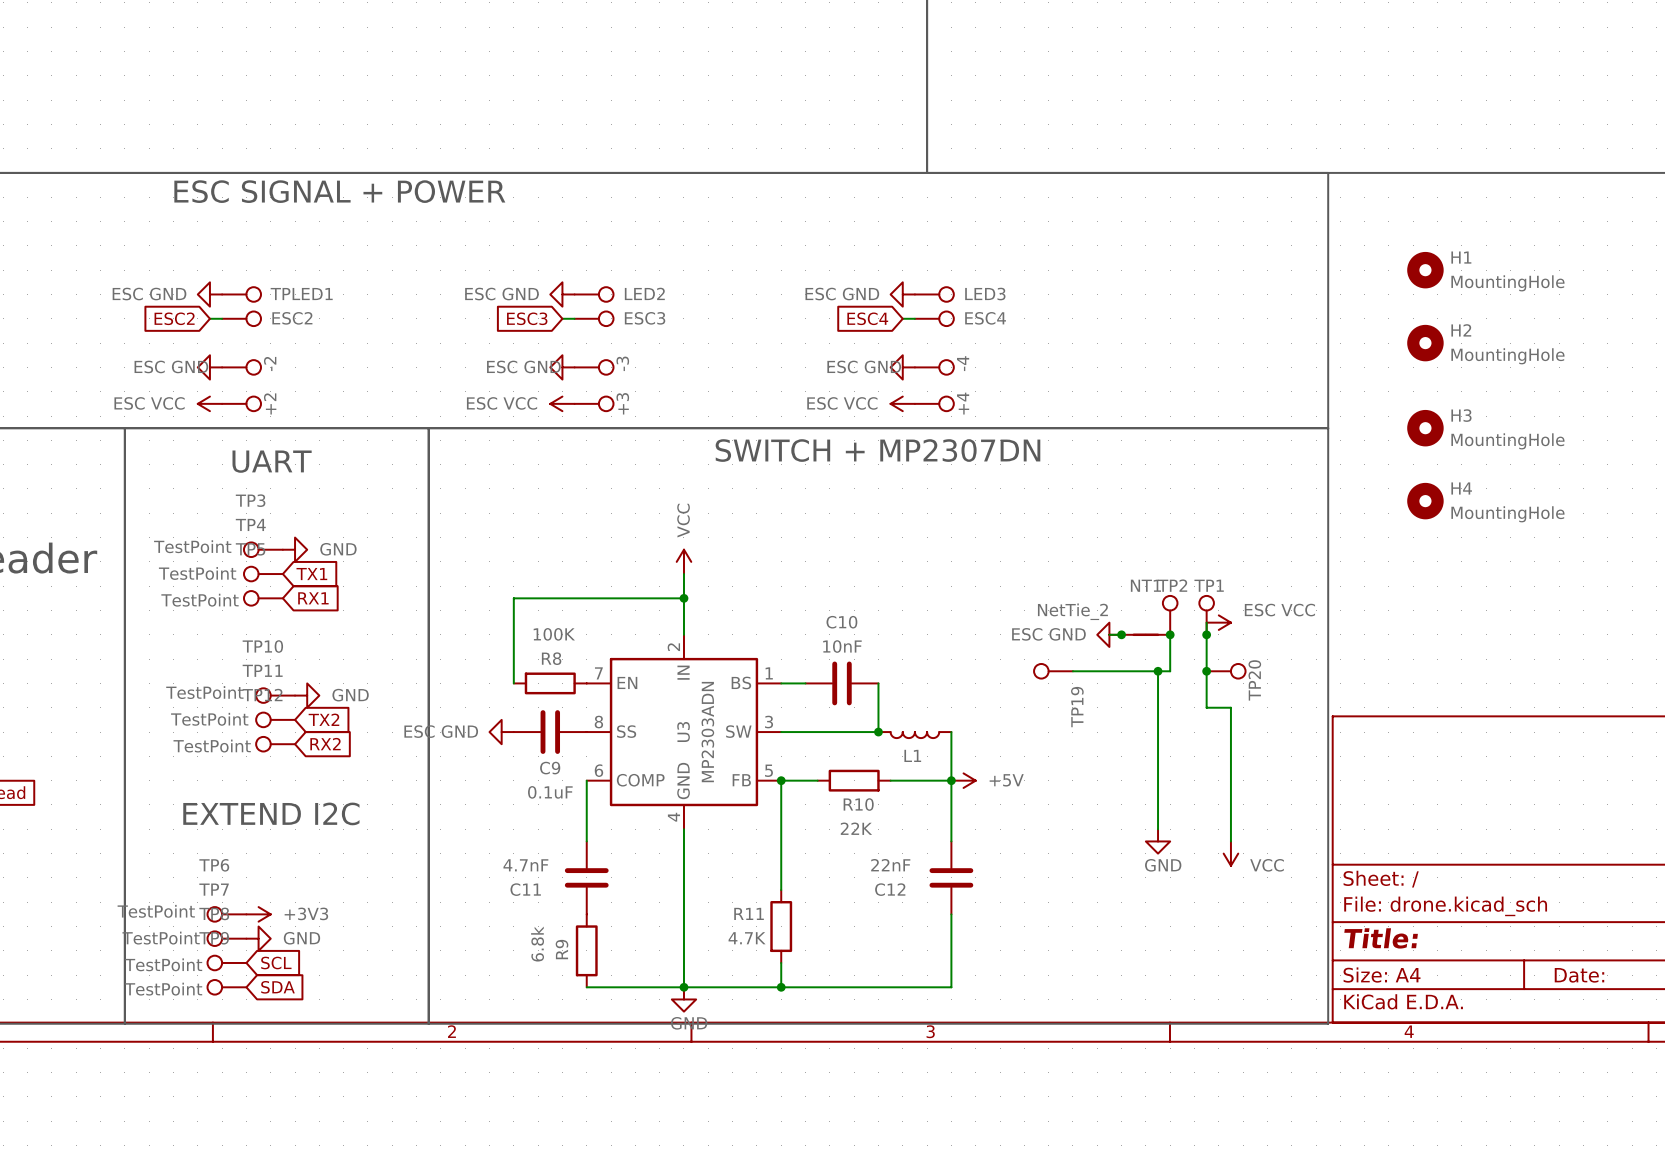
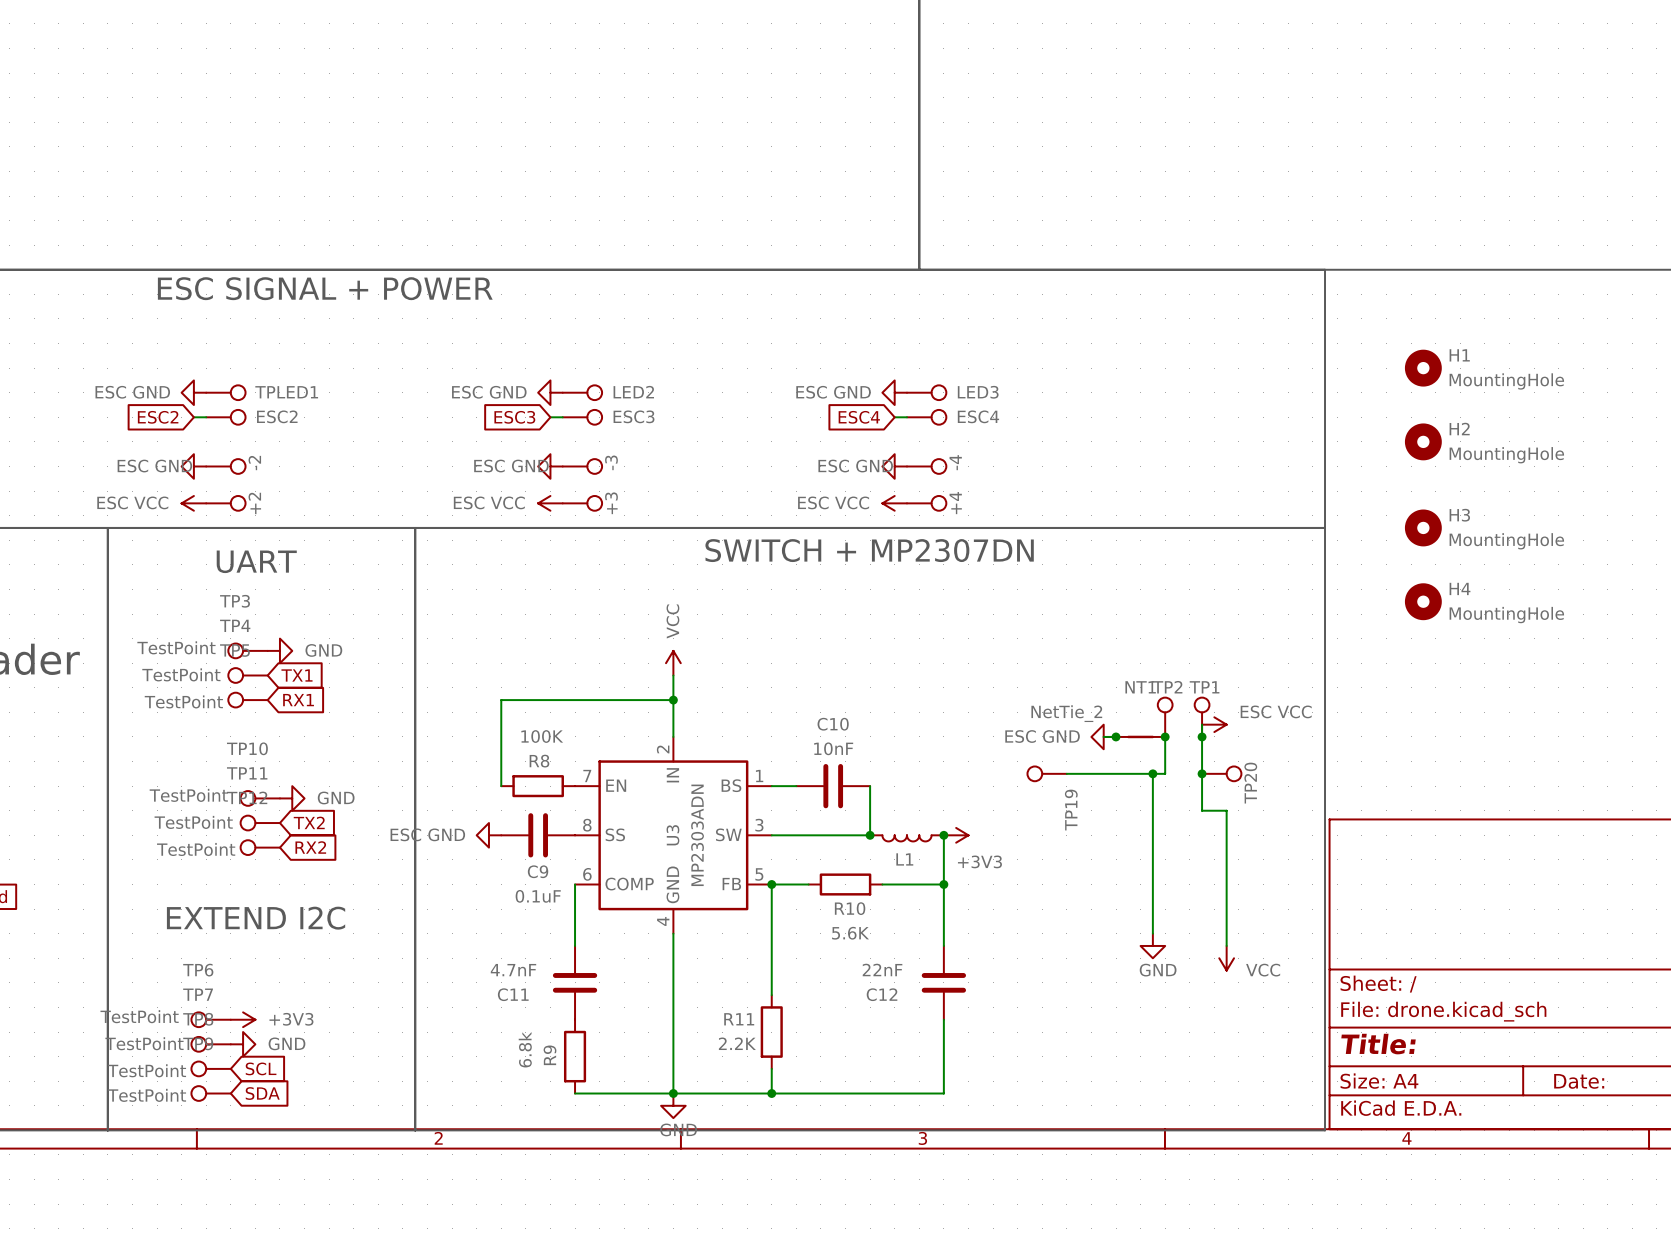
junction: none -> (943, 835)
power symbol: none -> +3V3 (956, 835)
power symbol: +5V (963, 780) -> none
R10 value: 22K (856, 828) -> 5.6K (850, 933)
R11 value: 4.7K (747, 938) -> 2.2K (737, 1043)

